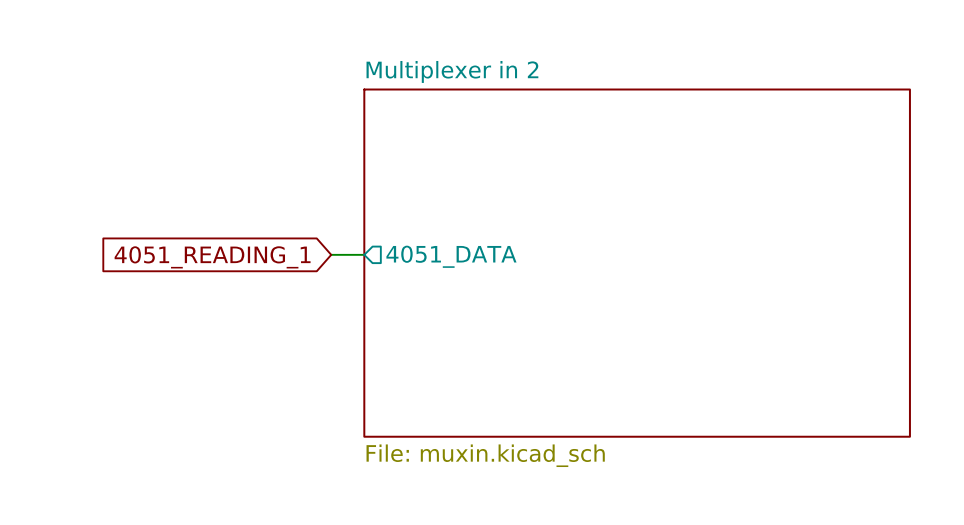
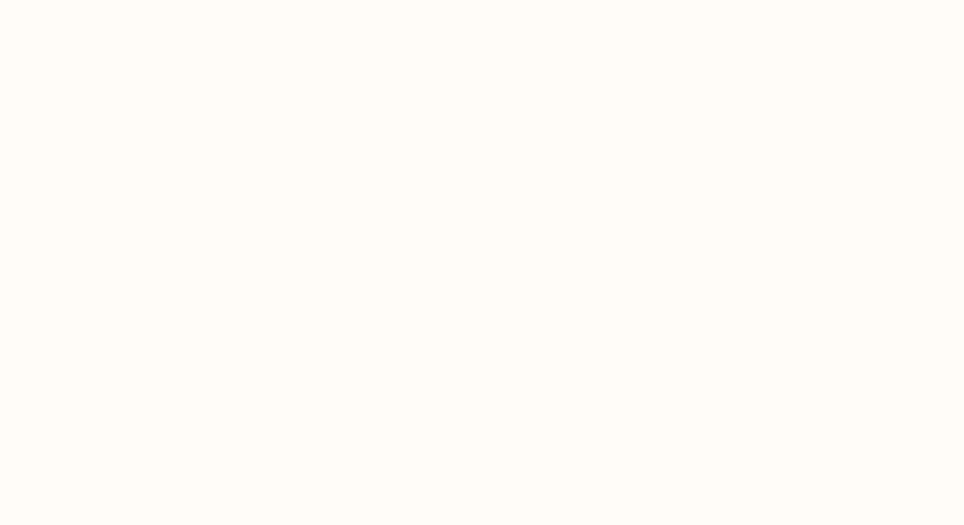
wire: (331, 254) (364, 254) -> none
sheet pin: 4051_DATA (451, 256) -> none
global label: 4051_READING_1 (212, 257) -> none
sheet Multiplexer in 2: File: muxin.kicad_sch (637, 263) -> none

